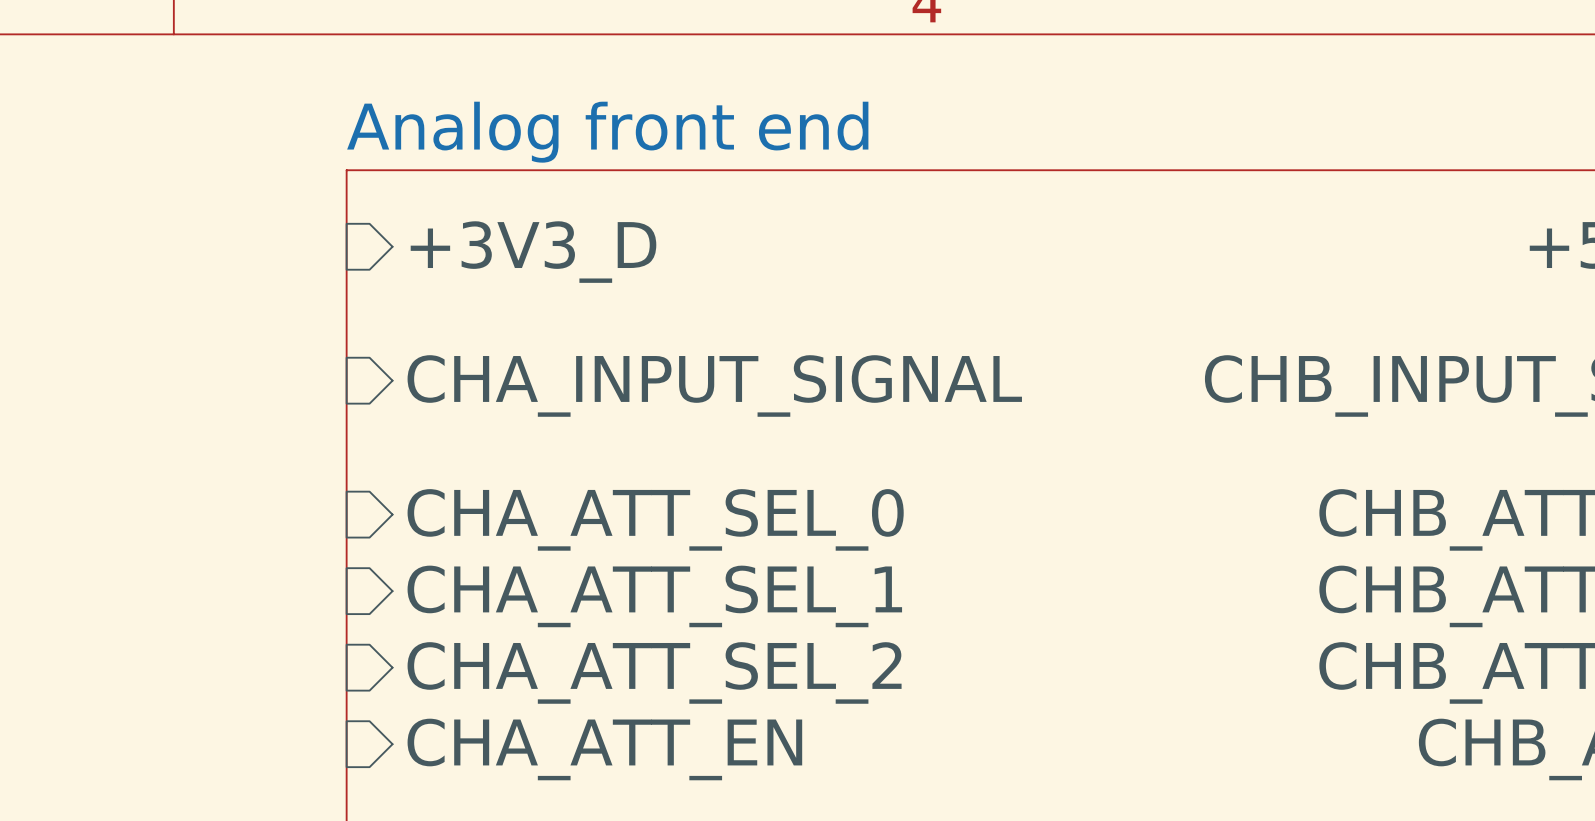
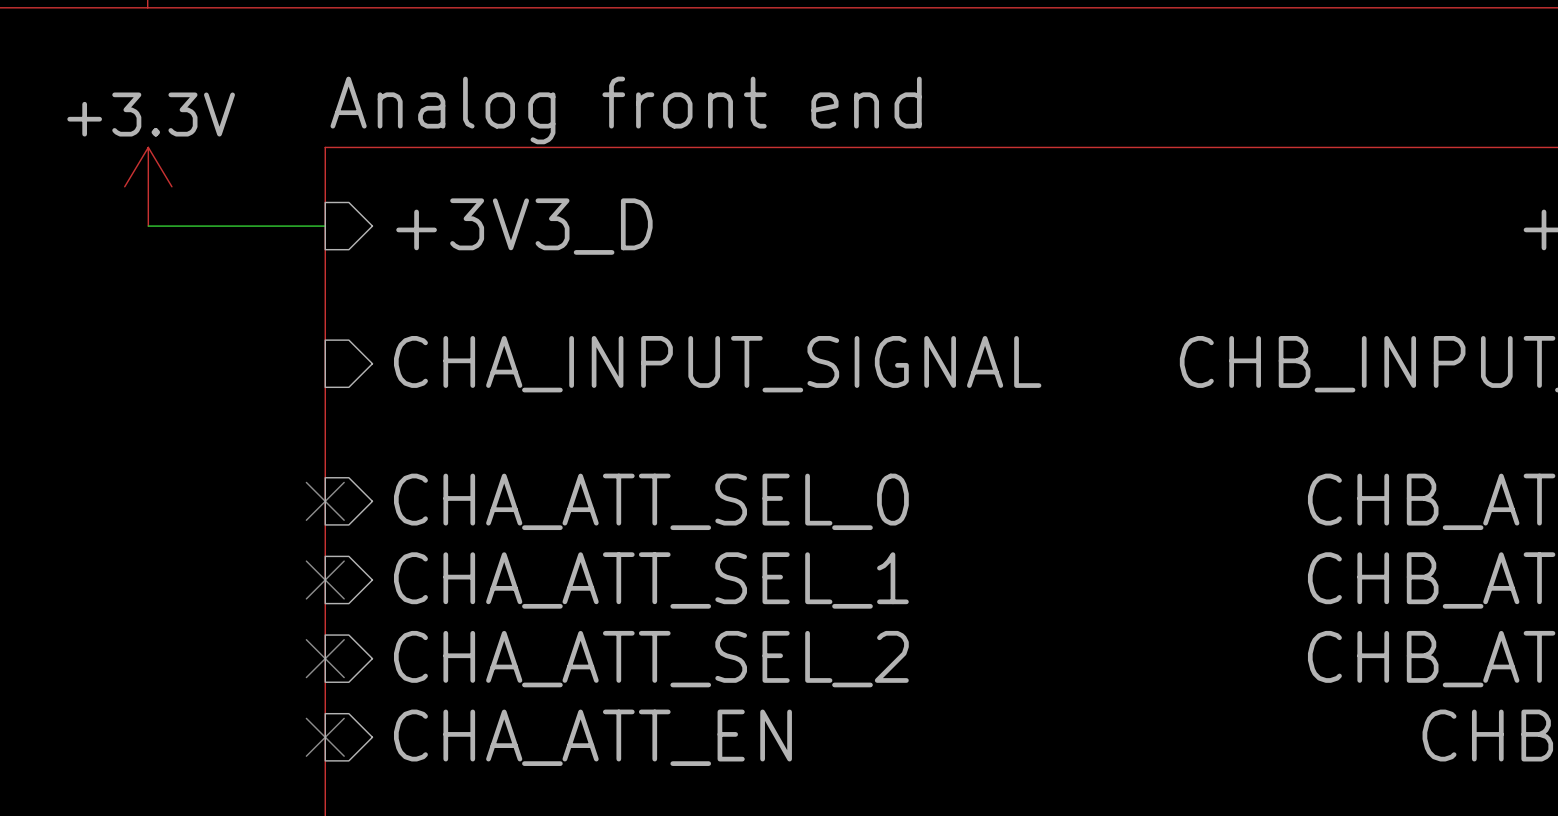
power symbol: none -> +3.3V (148, 186)
wire: none -> (148, 226) (325, 226)
no-connect mark: none -> (325, 501)
no-connect mark: none -> (325, 579)
no-connect mark: none -> (325, 658)
no-connect mark: none -> (325, 737)

